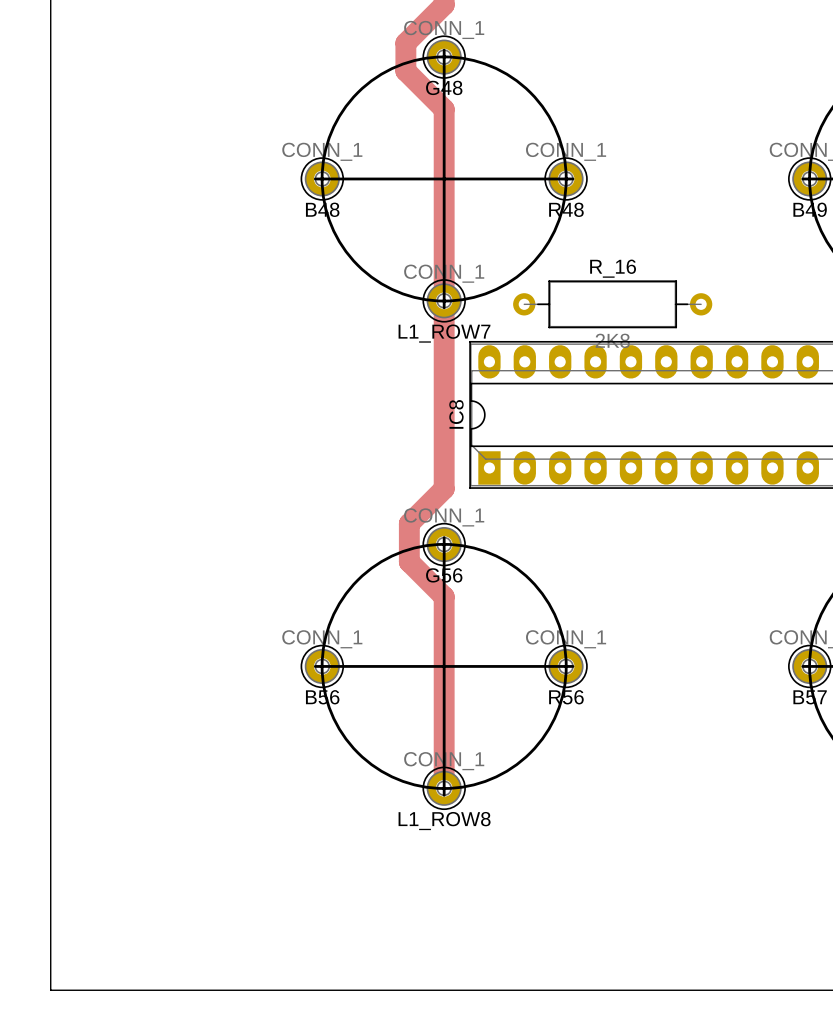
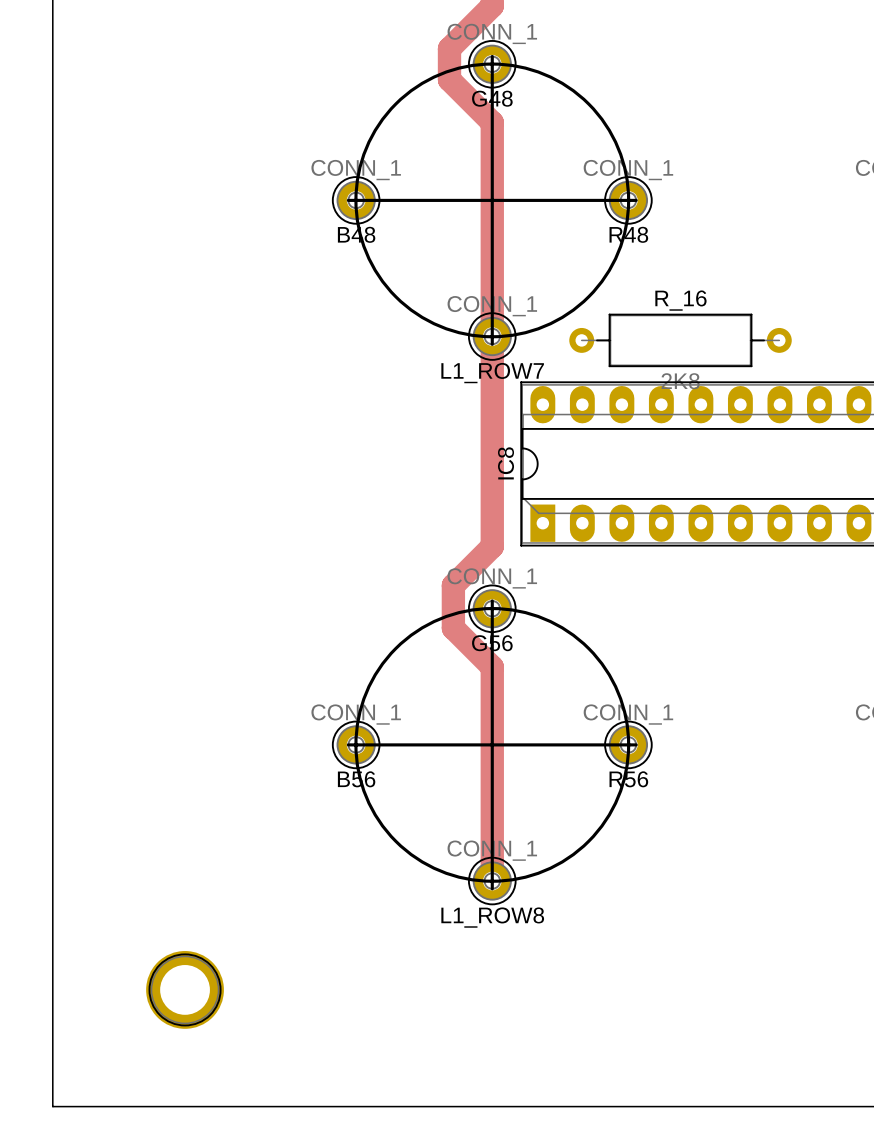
part: none -> (185, 989)

